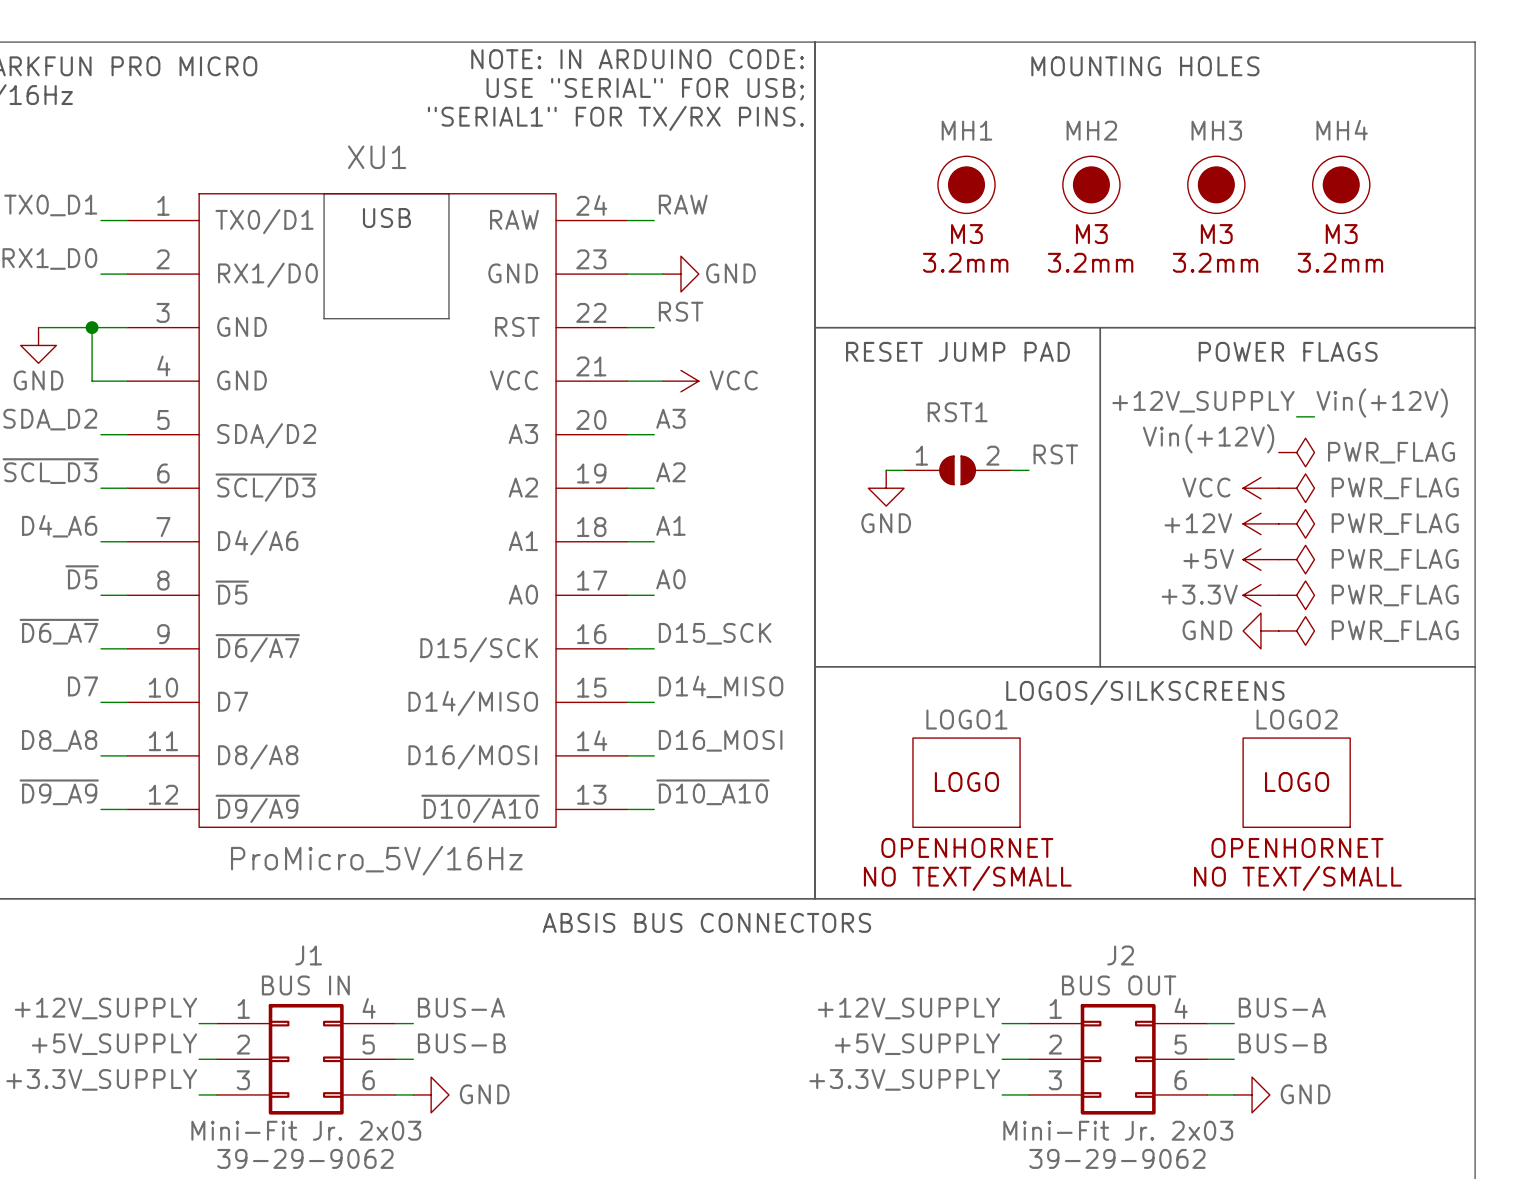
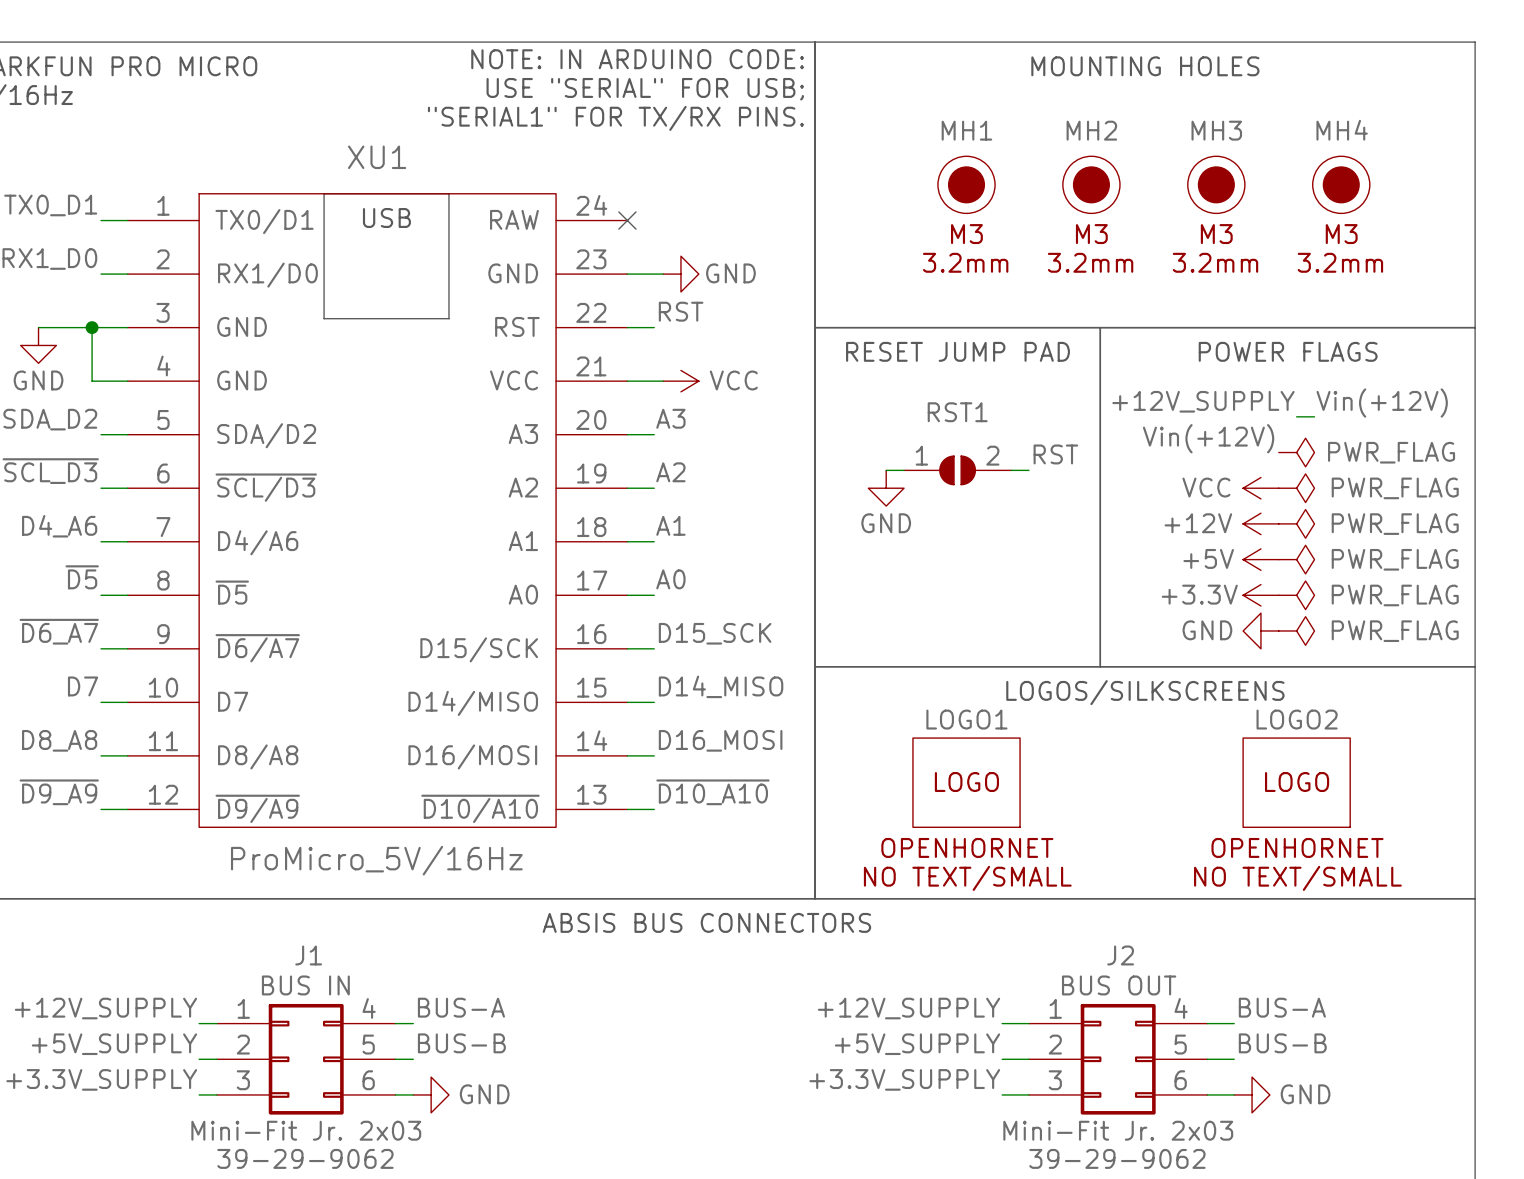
label: RAW (683, 204) -> none
wire: (627, 220) (654, 220) -> none
no-connect mark: none -> (627, 220)

